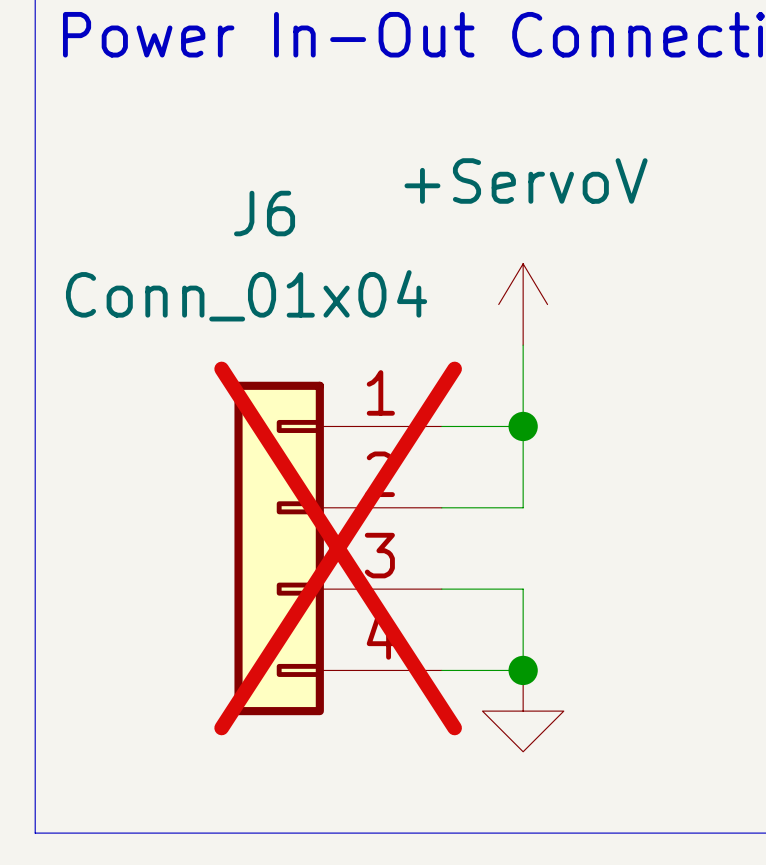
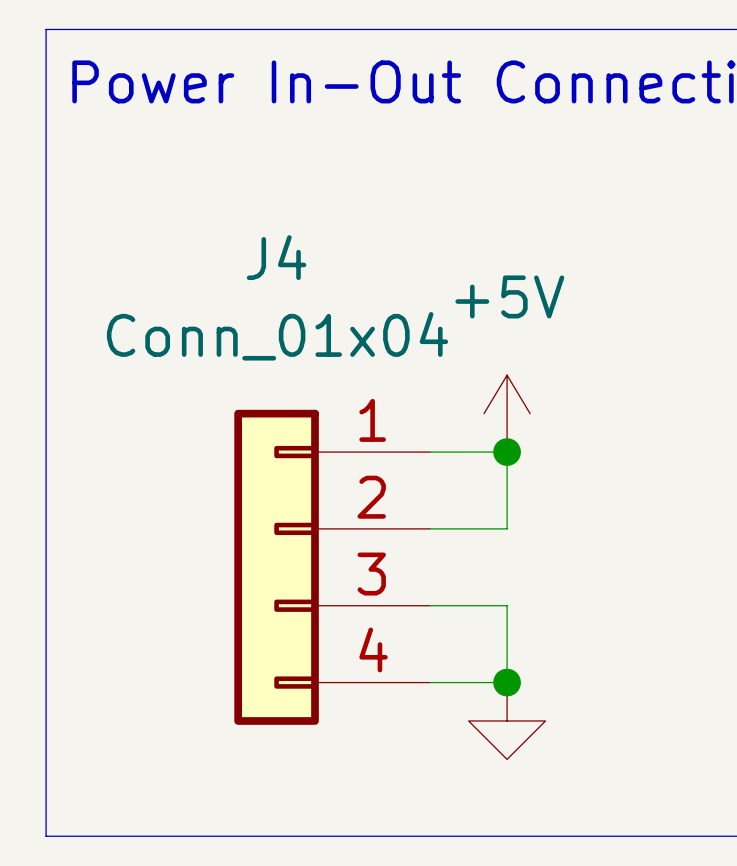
J6 name: J6 (264, 213) -> J4 (276, 257)
J6 value position: Conn_01x04 (246, 295) -> Conn_01x04 (277, 336)
power symbol: +ServoV (523, 304) -> none
power symbol: none -> +5V (507, 413)
J6 do-not-place cross: (338, 548) -> none

